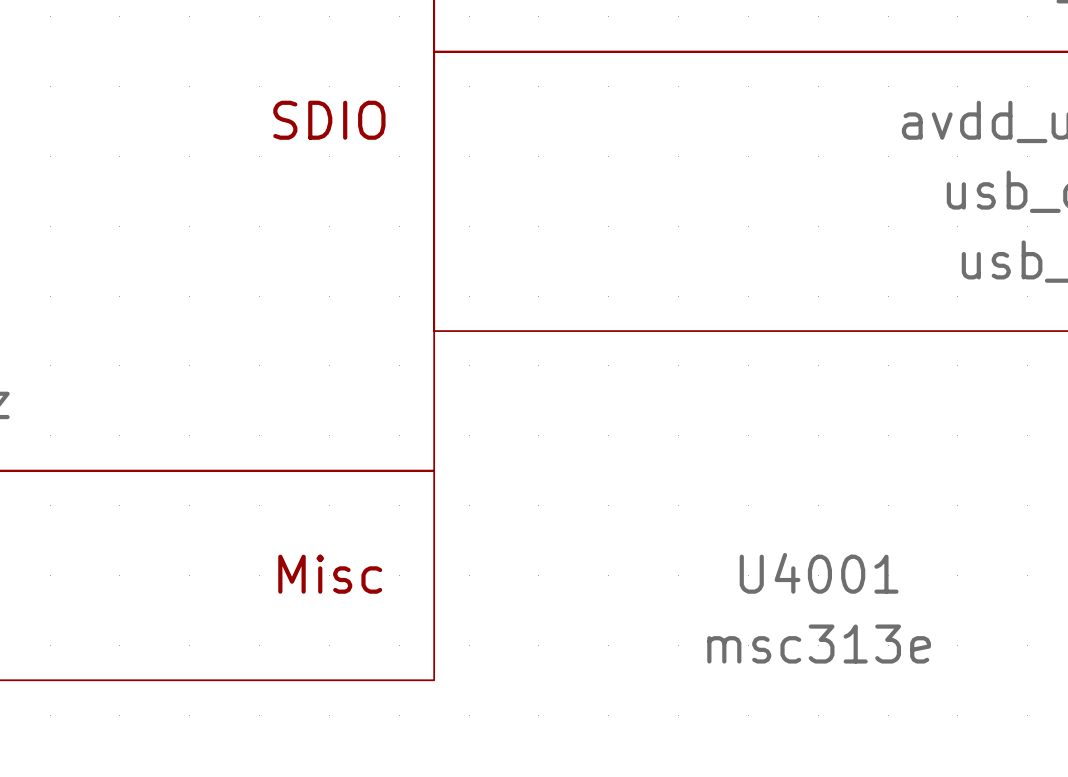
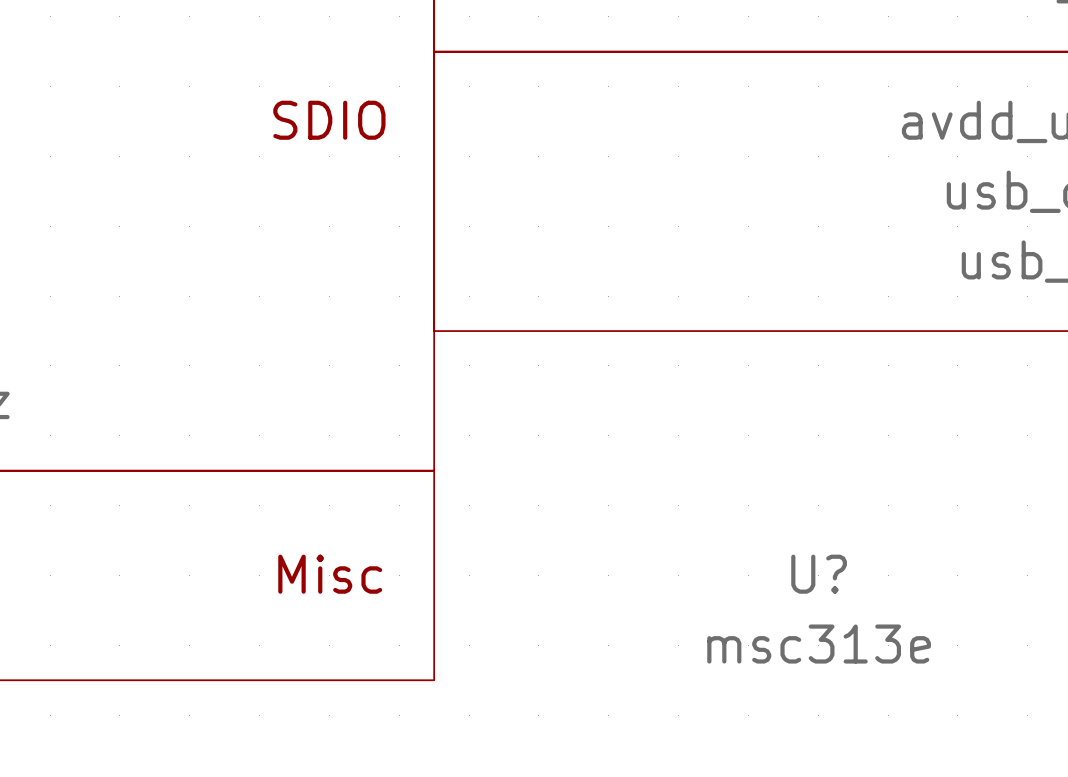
U4001 name: U4001 (819, 573) -> U? (819, 574)

